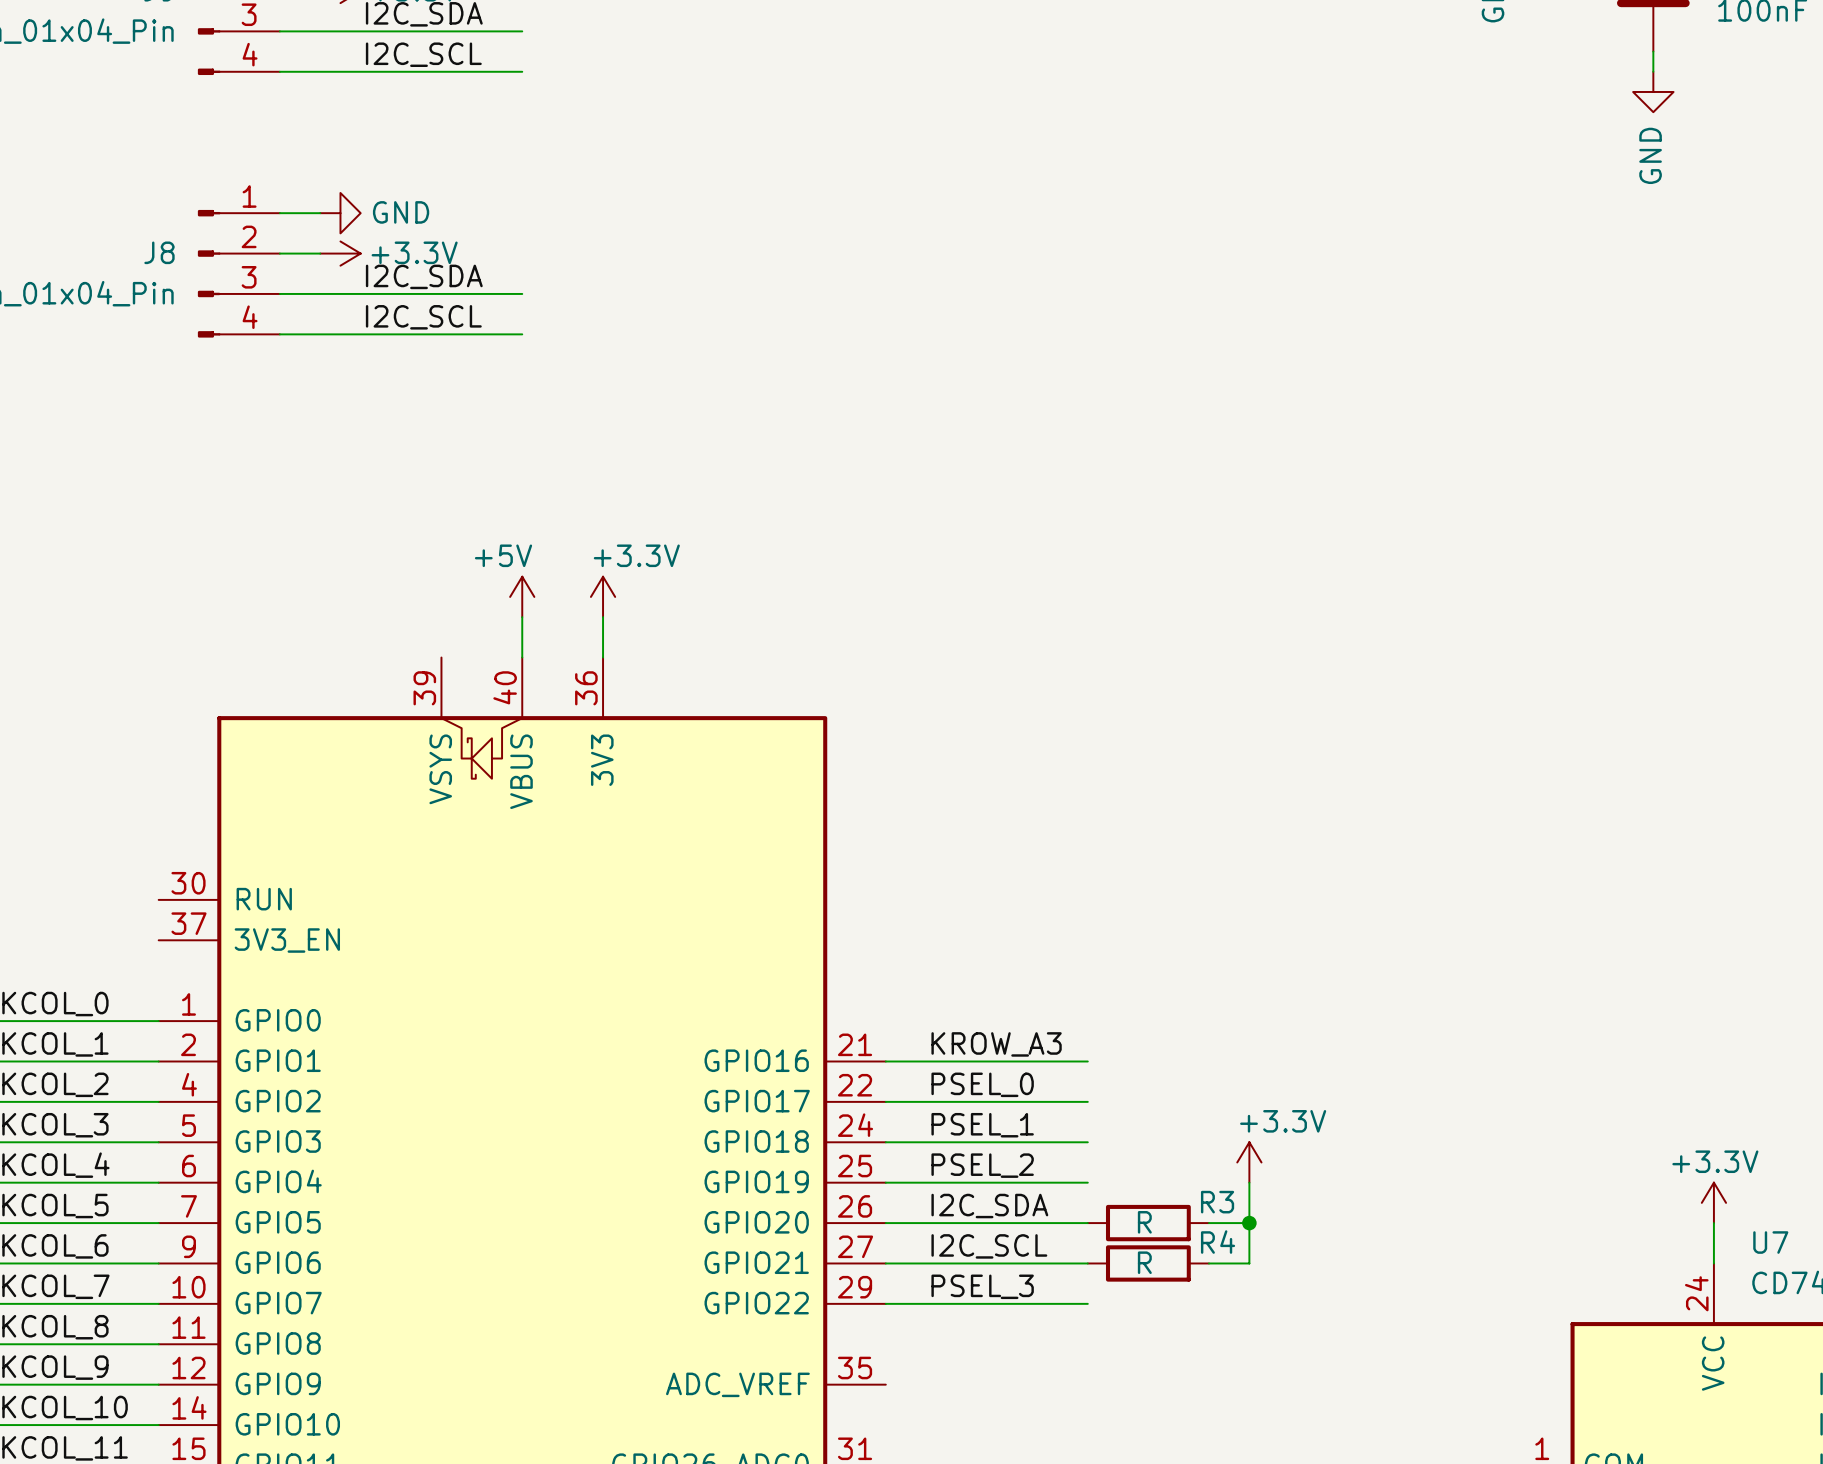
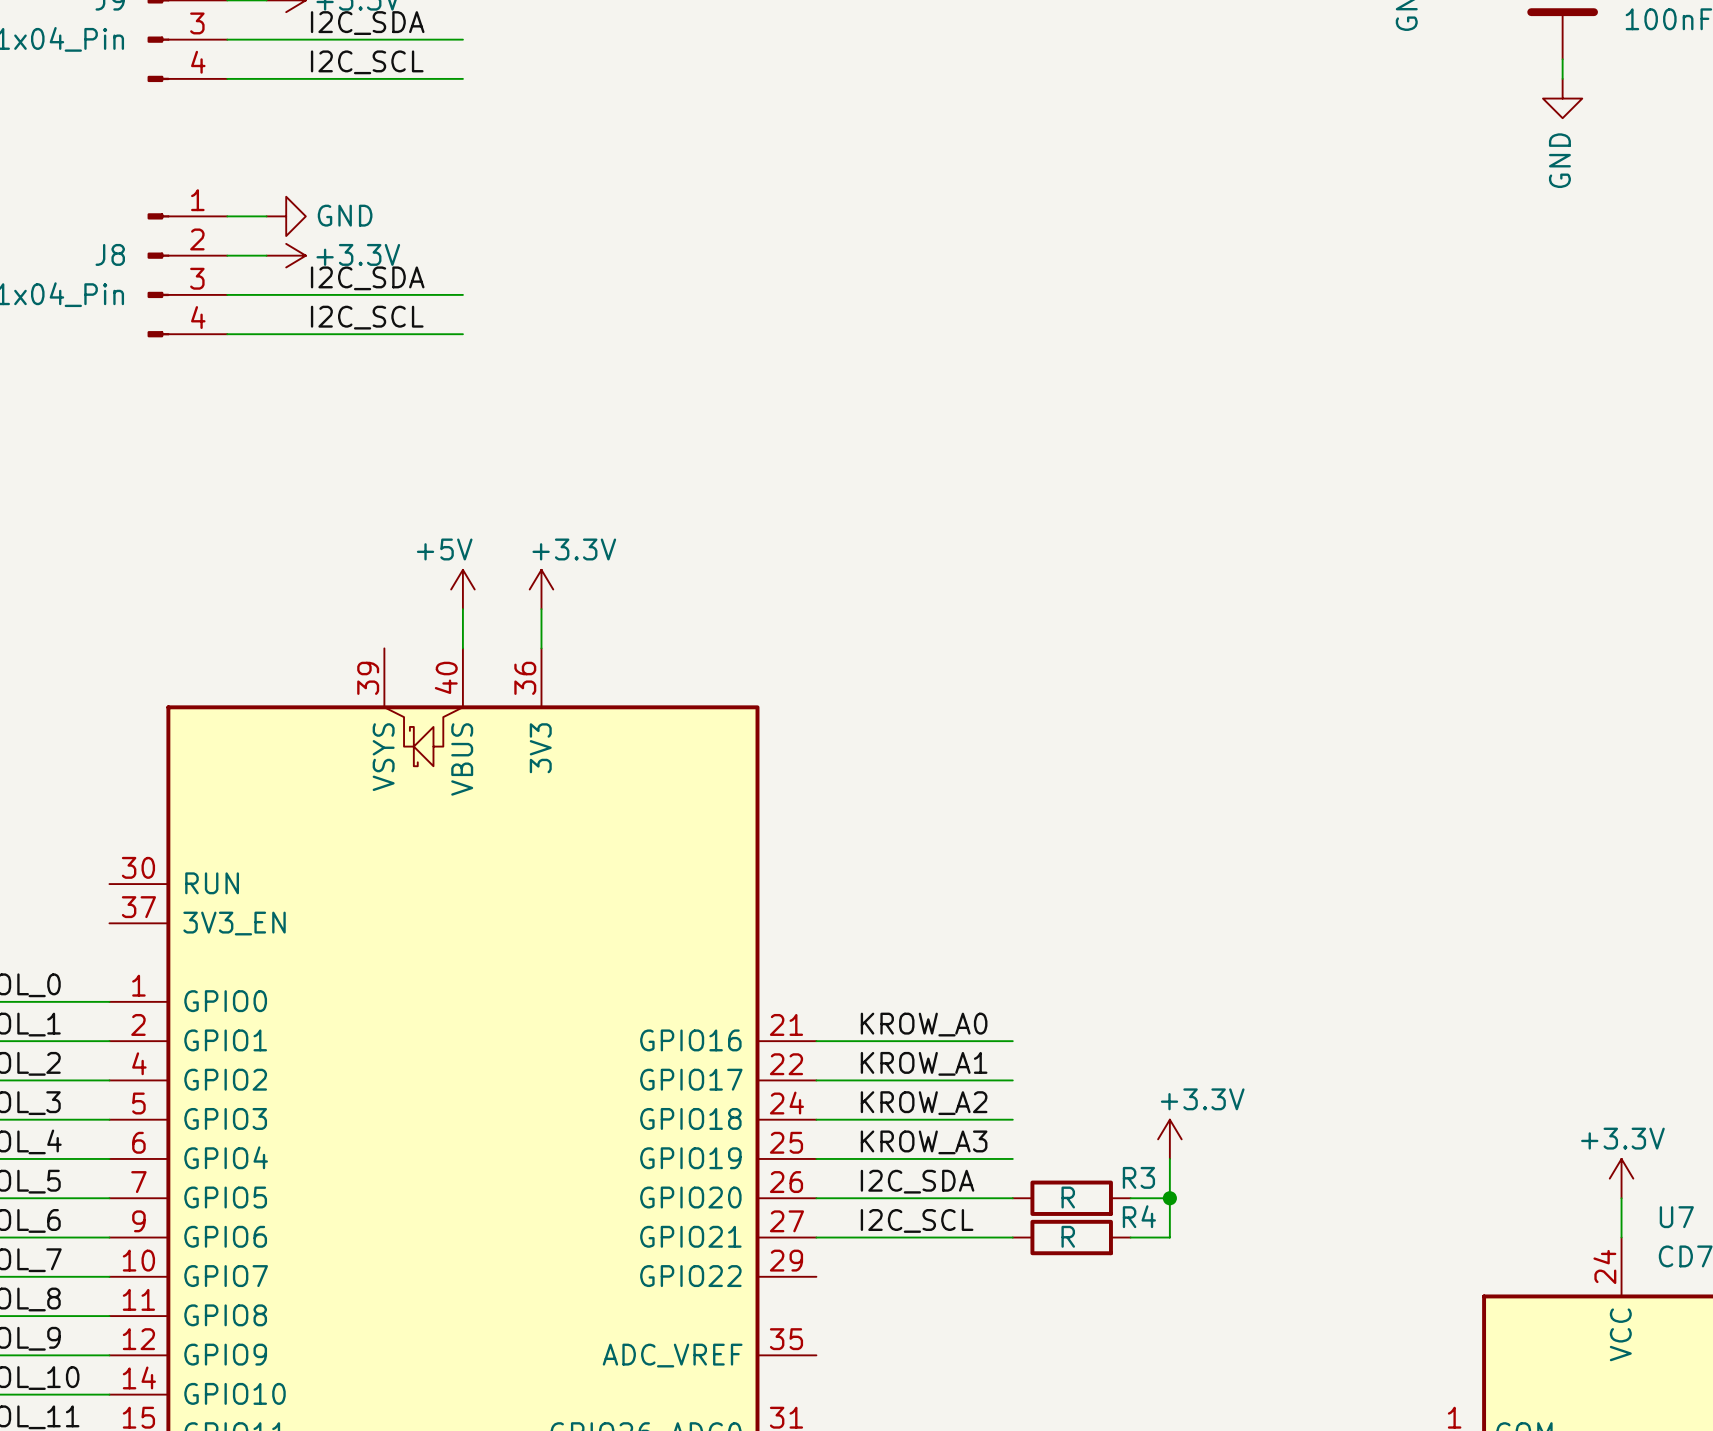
label: KROW_A3 (996, 1044) -> KROW_A0 (924, 1024)
label: PSEL_0 (982, 1084) -> KROW_A1 (924, 1063)
label: PSEL_1 (982, 1125) -> KROW_A2 (924, 1103)
label: PSEL_2 (982, 1165) -> KROW_A3 (924, 1142)
label: PSEL_3 (982, 1286) -> none
wire: (885, 1303) (1087, 1303) -> none

